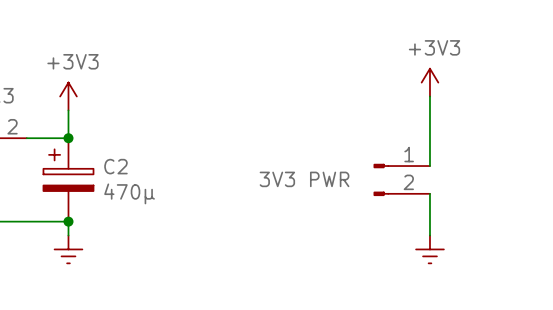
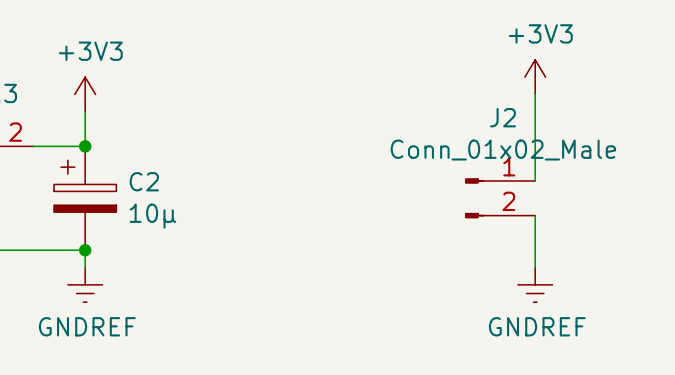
J2 name: none -> J2 (502, 117)
J2 value: 3V3 PWR (304, 179) -> Conn_01x02_Male (503, 150)
C2 value: 470µ (129, 193) -> 10µ (152, 216)
power symbol text: none -> GNDREF (87, 326)
power symbol text: none -> GNDREF (537, 326)

